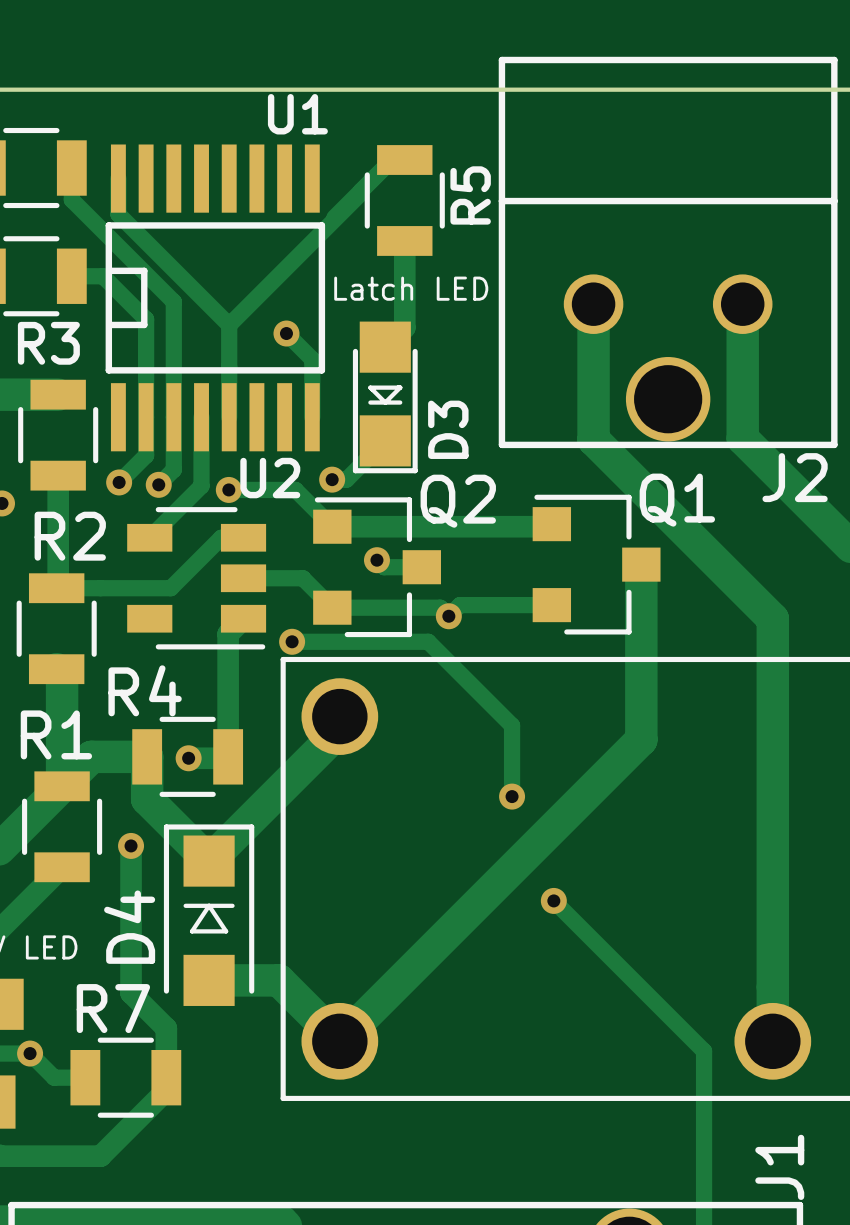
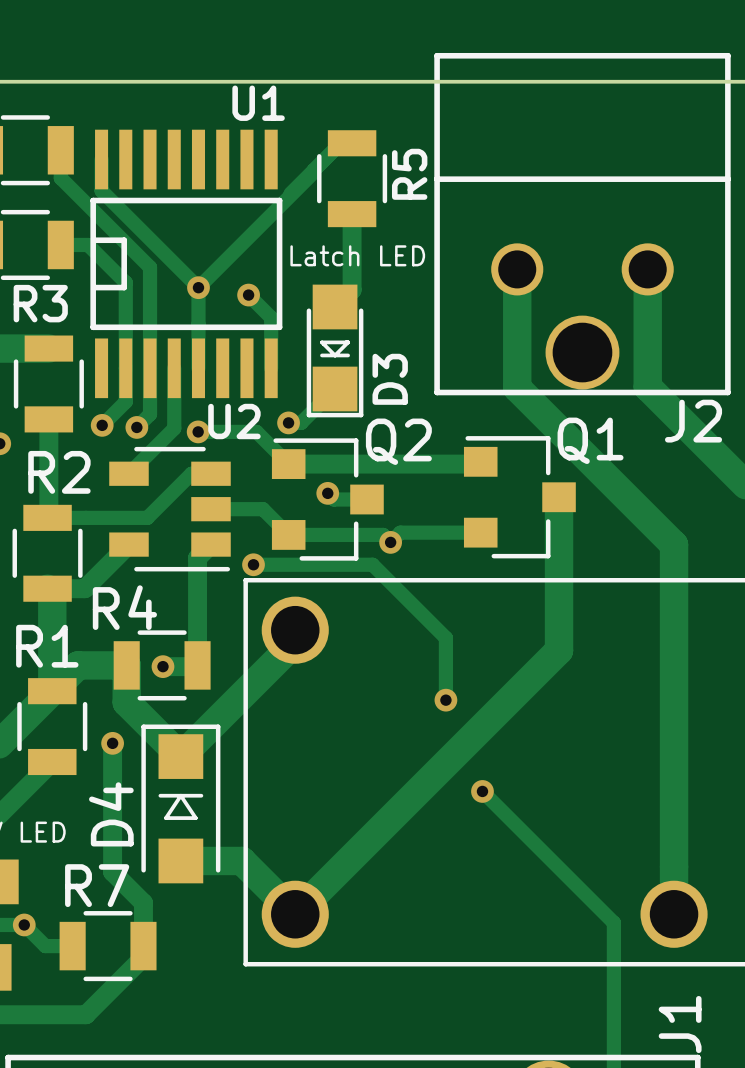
via: none -> (198, 287)
track: none -> (128, 544) (84, 588) (47, 588)

